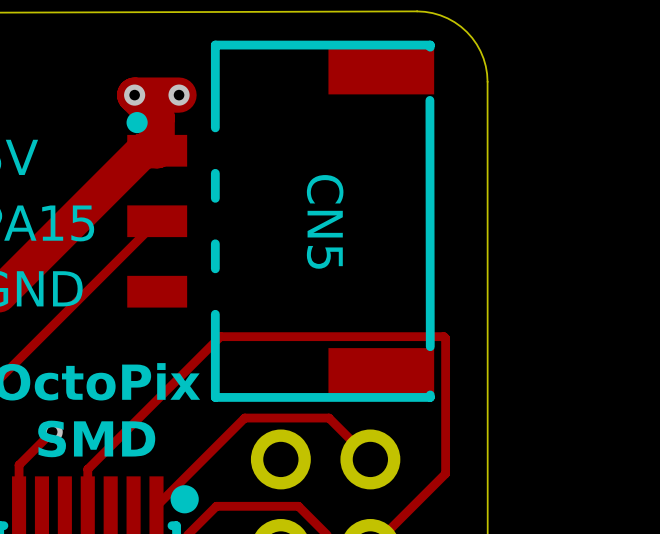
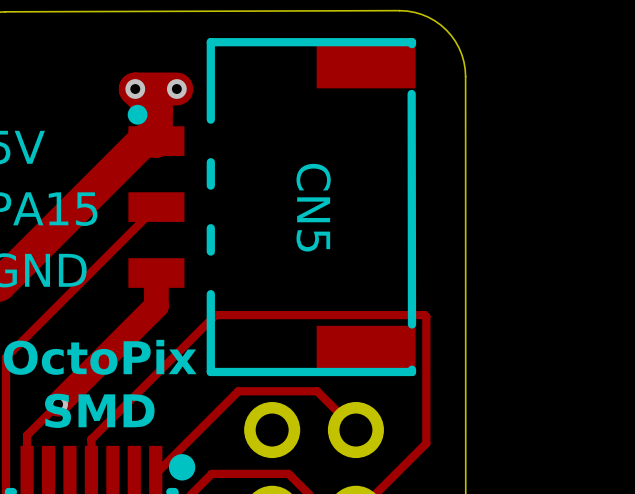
track: none -> (156, 273) (156, 306) (58, 404)

